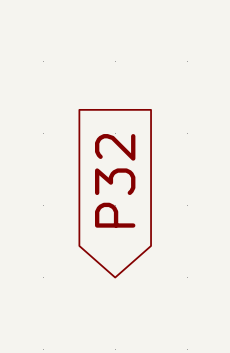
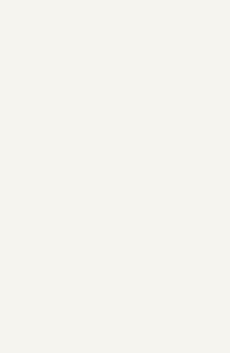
global label: P32 (115, 180) -> none

